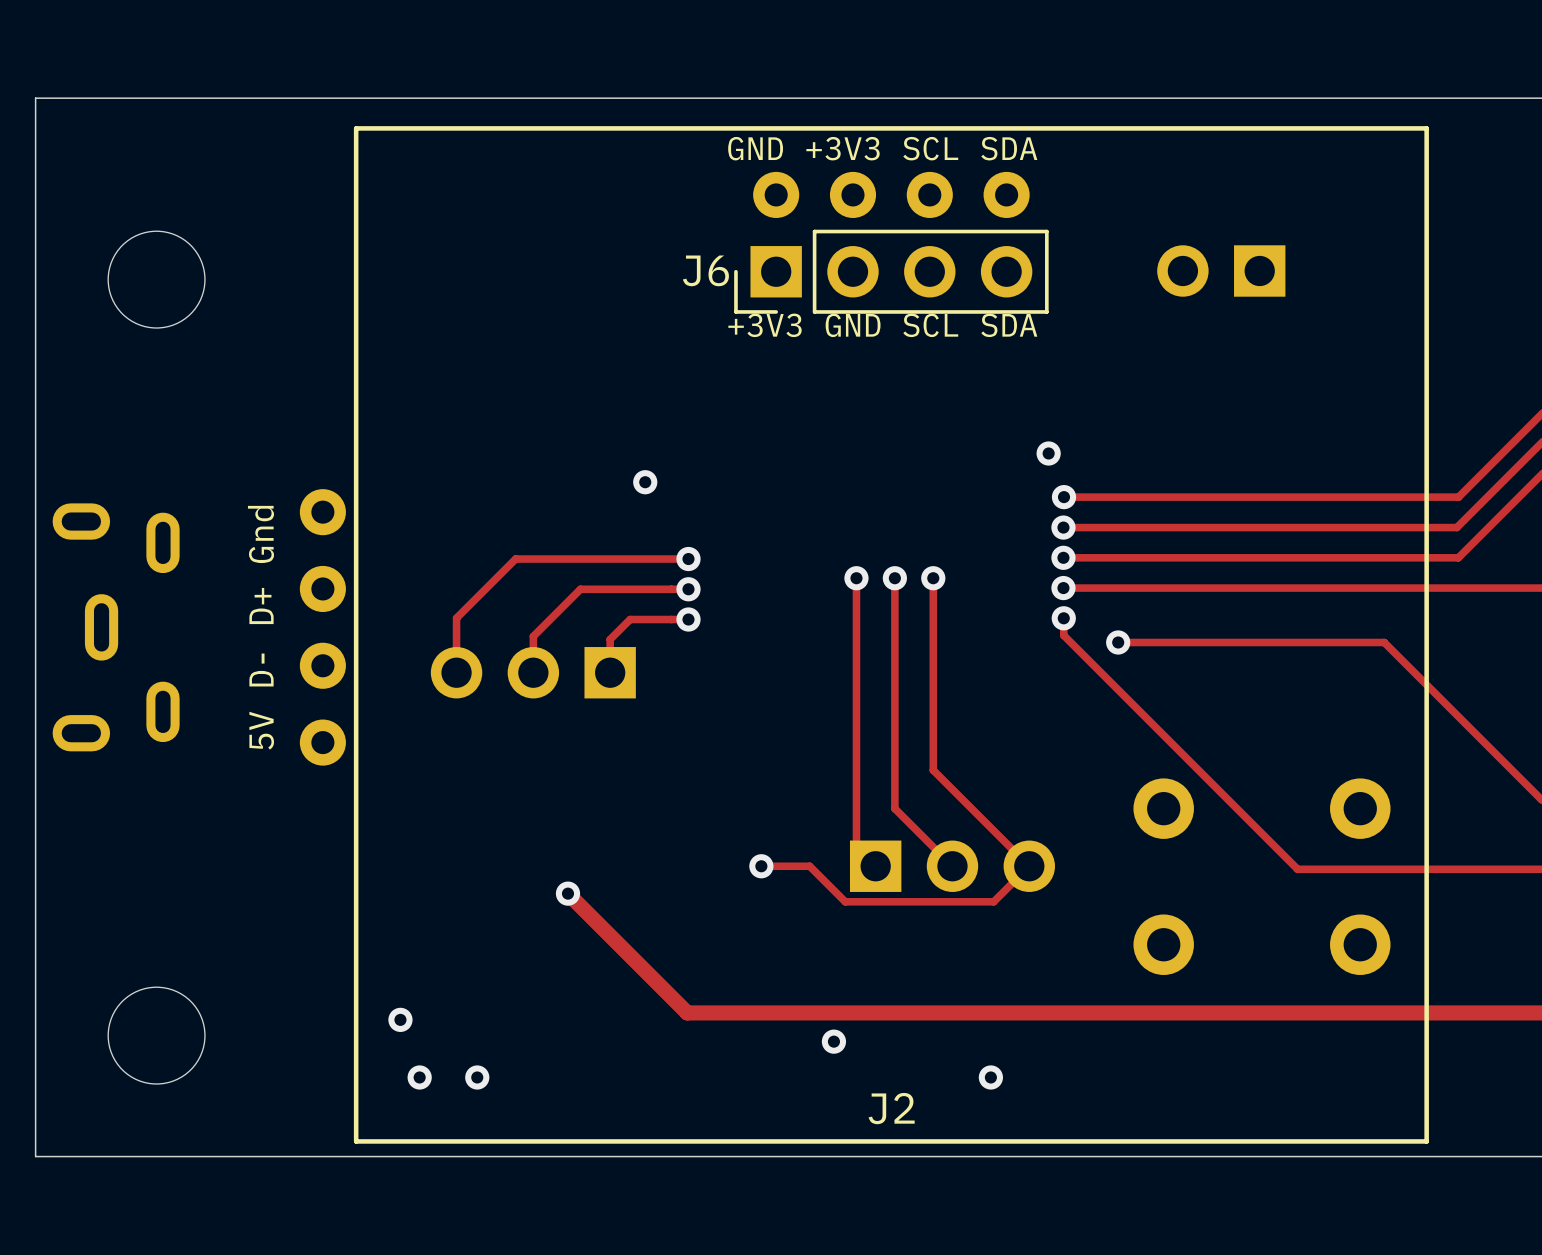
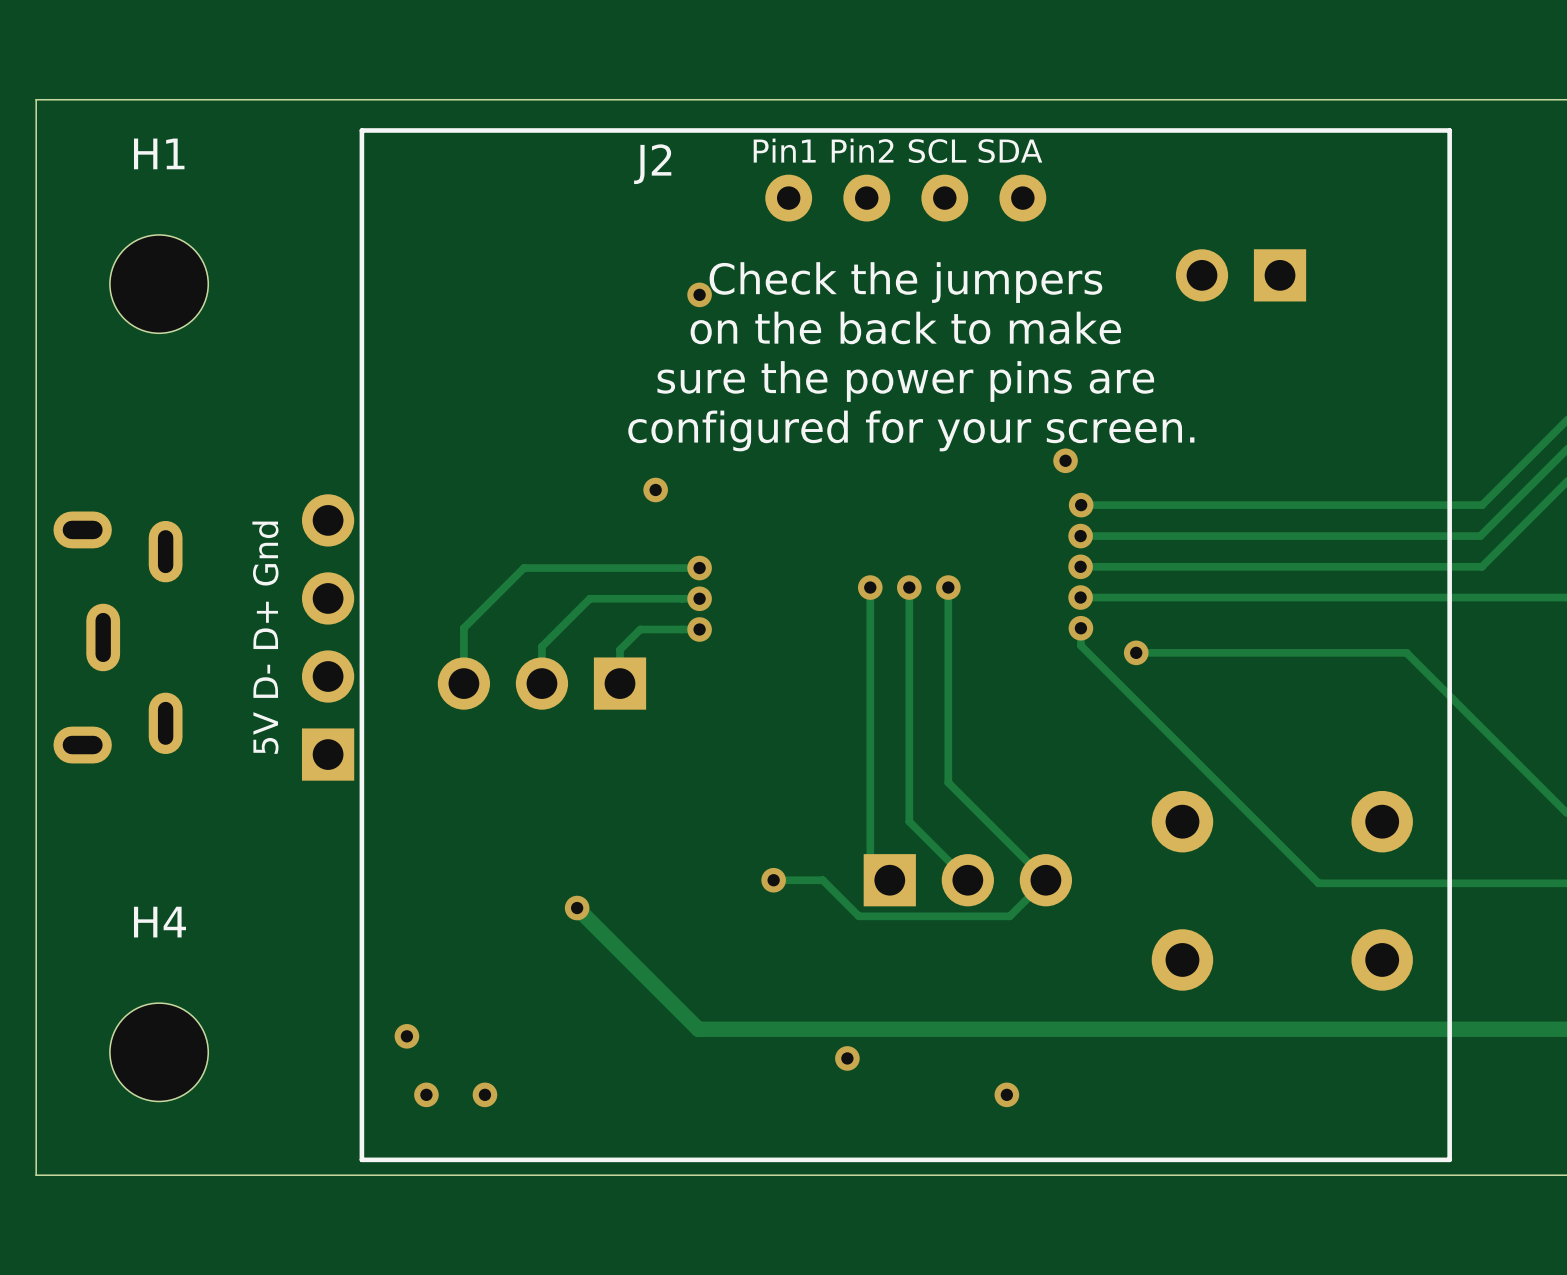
text: GND +3V3 SCL SDA (882, 148) -> Pin1 Pin2 SCL SDA (897, 150)
H1 name: none -> H1 (159, 153)
J6: (891, 271) -> none
text: none -> Check the jumpers (905, 282)
via: none -> (699, 294)
text: +3V3 GND SCL SDA (882, 325) -> on the back to make (905, 327)
text: none -> sure the power pins are (905, 381)
text: none -> configured for your screen. (911, 430)
part footprint: [299, 489, 346, 766] -> [301, 494, 355, 781]
H4 name: none -> H4 (159, 922)
J2 name position: J2 (891, 1108) -> J2 (652, 164)

